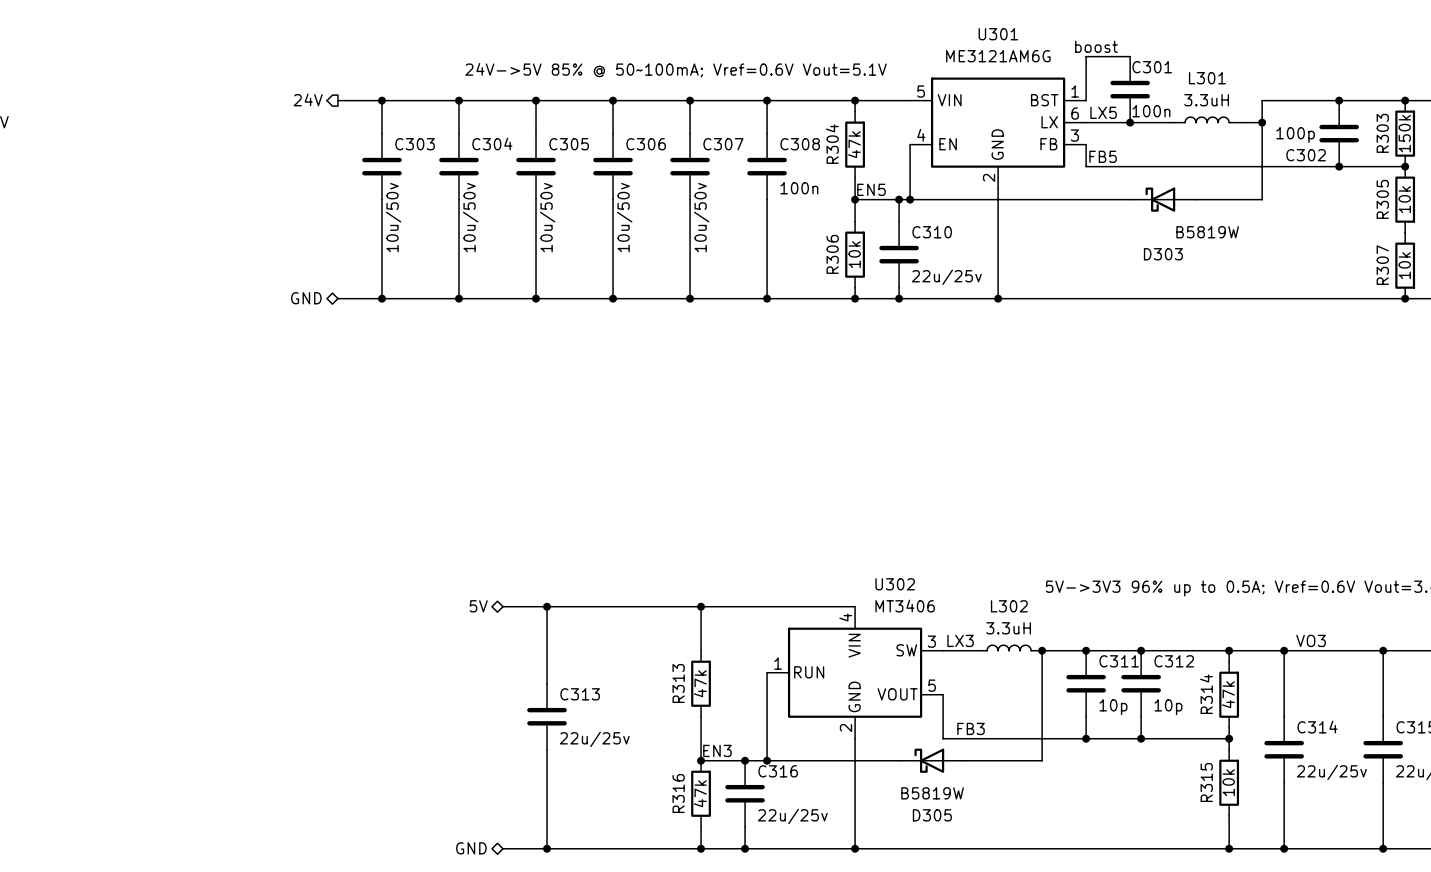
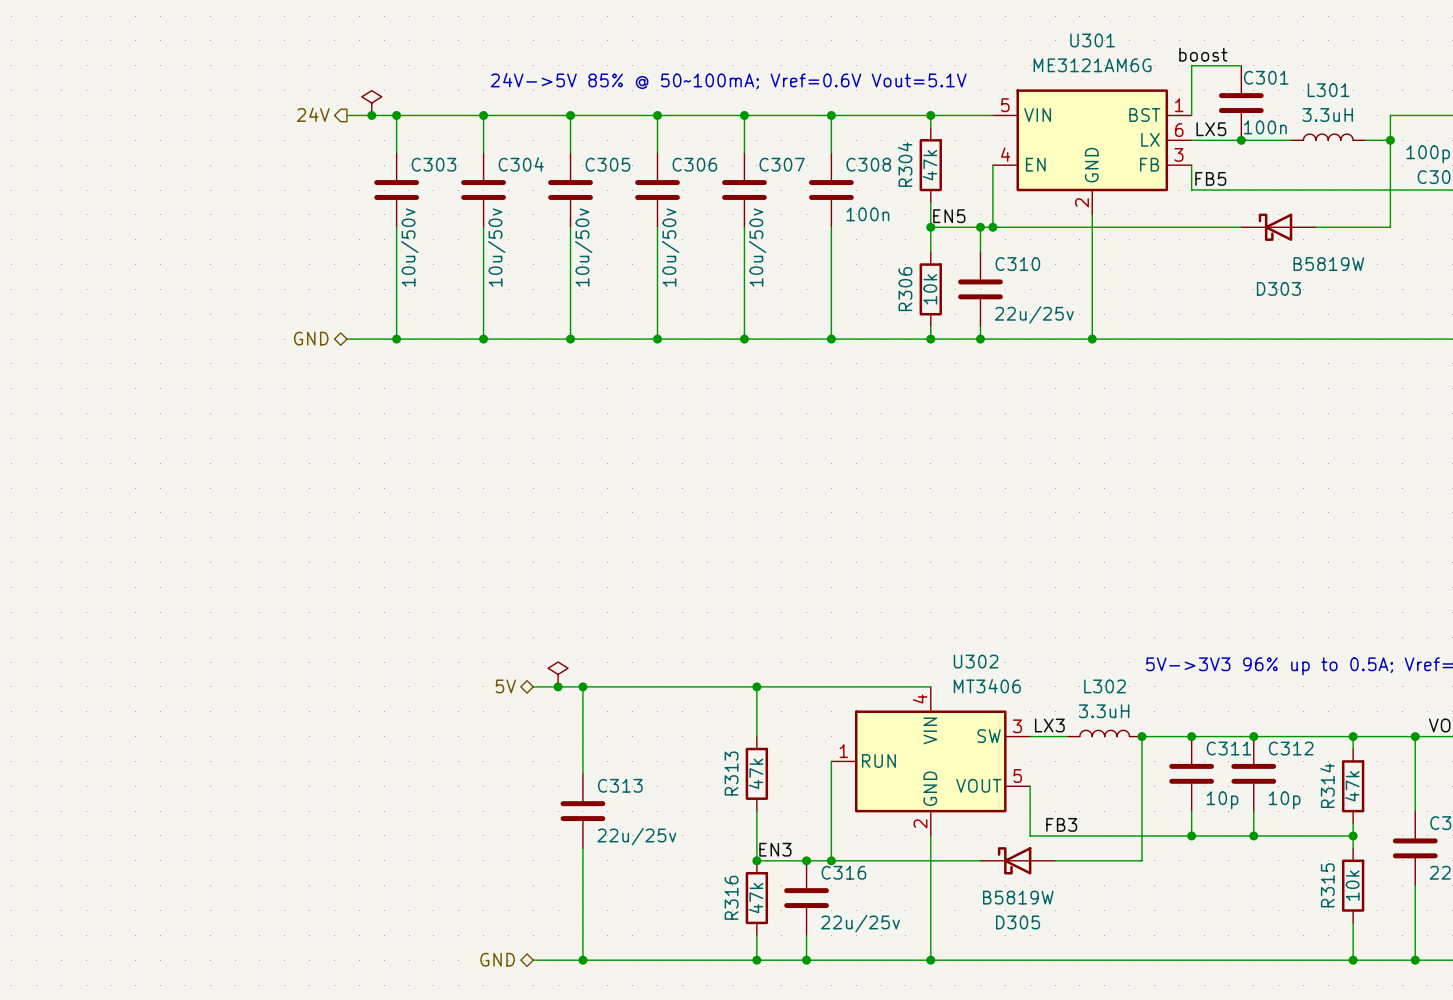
power symbol: none -> (371, 103)
junction: none -> (371, 115)
power symbol: none -> (558, 674)
junction: none -> (558, 686)

